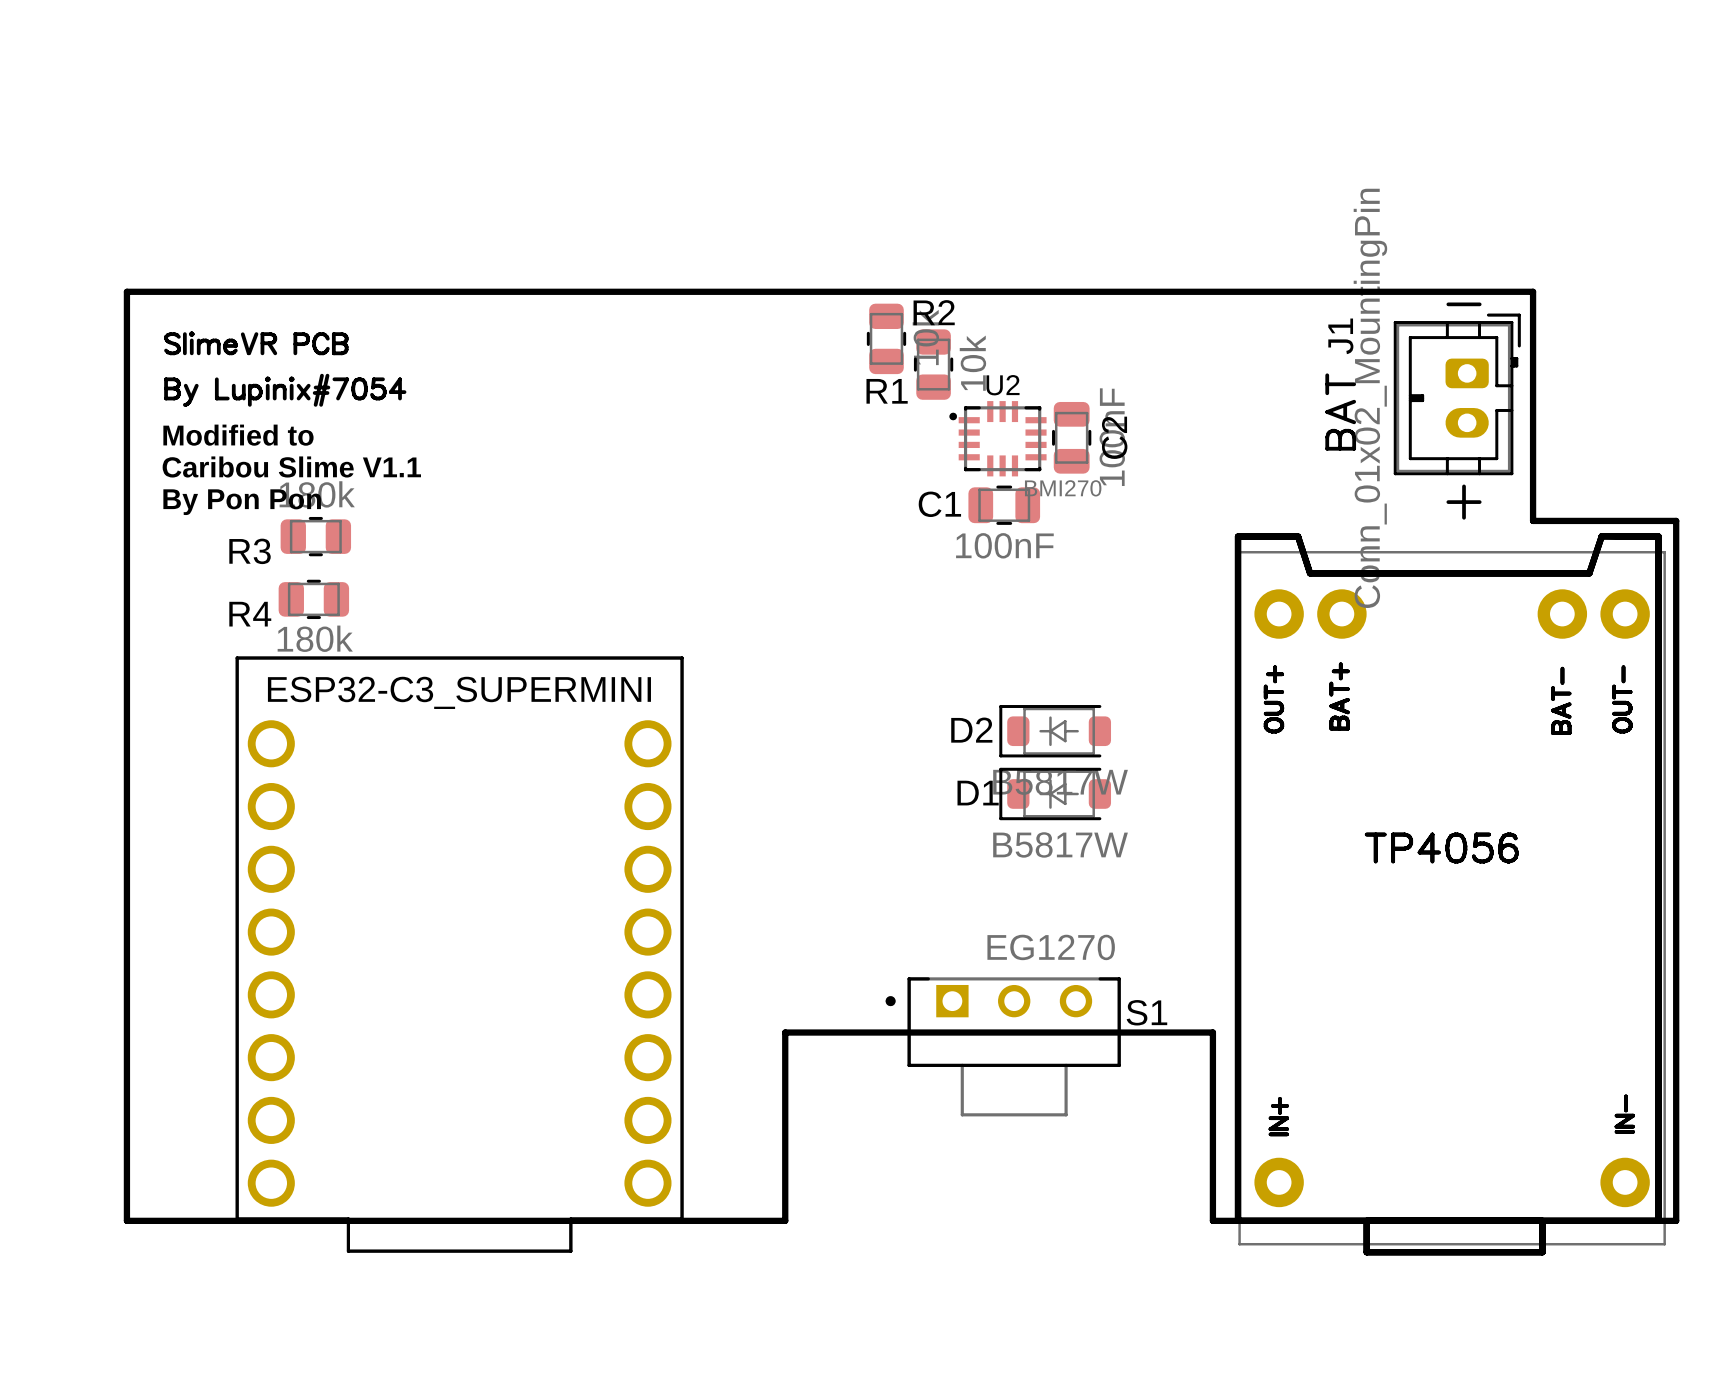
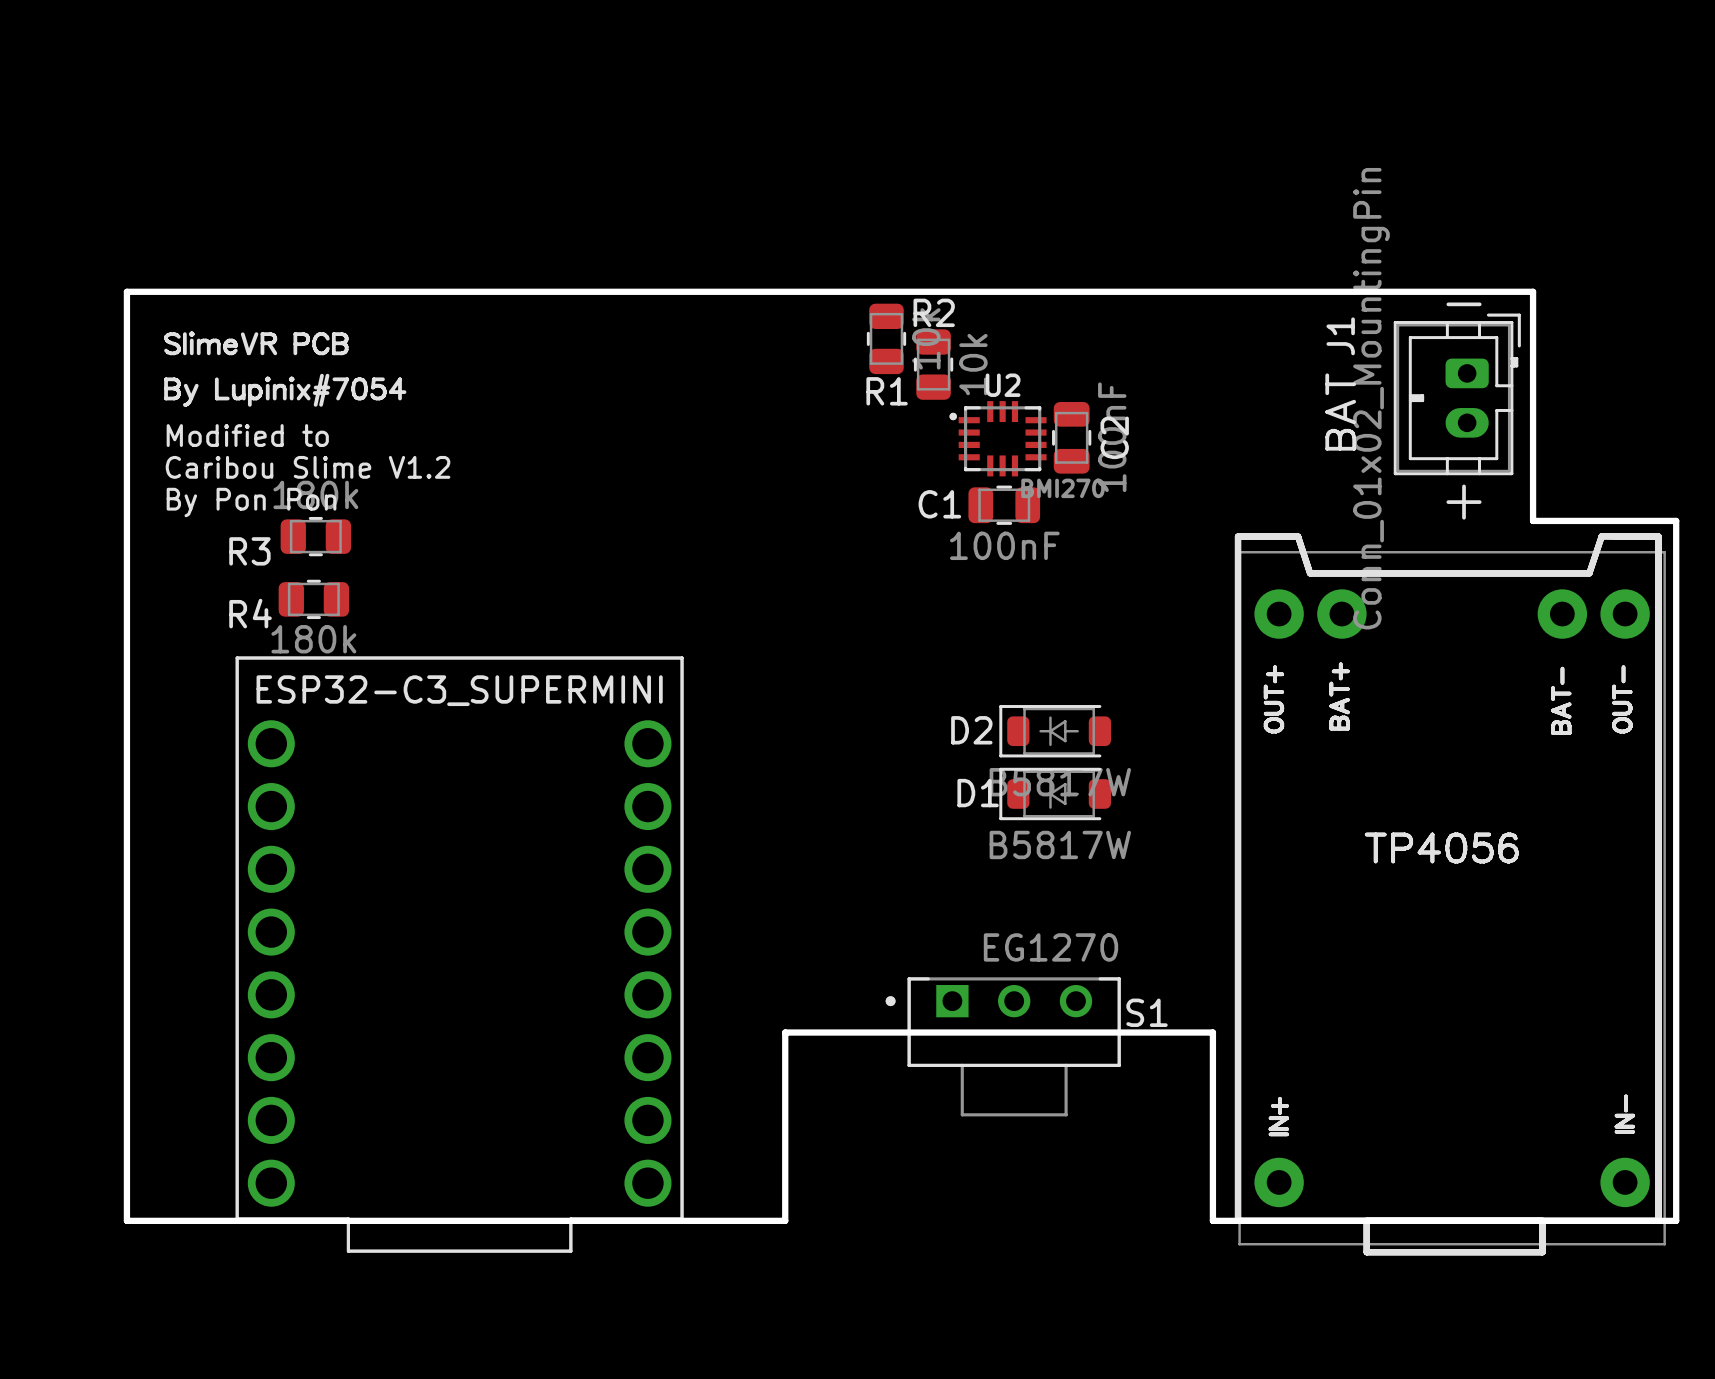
text: Caribou Slime V1.1 (291, 466) -> Caribou Slime V1.2 (308, 467)

